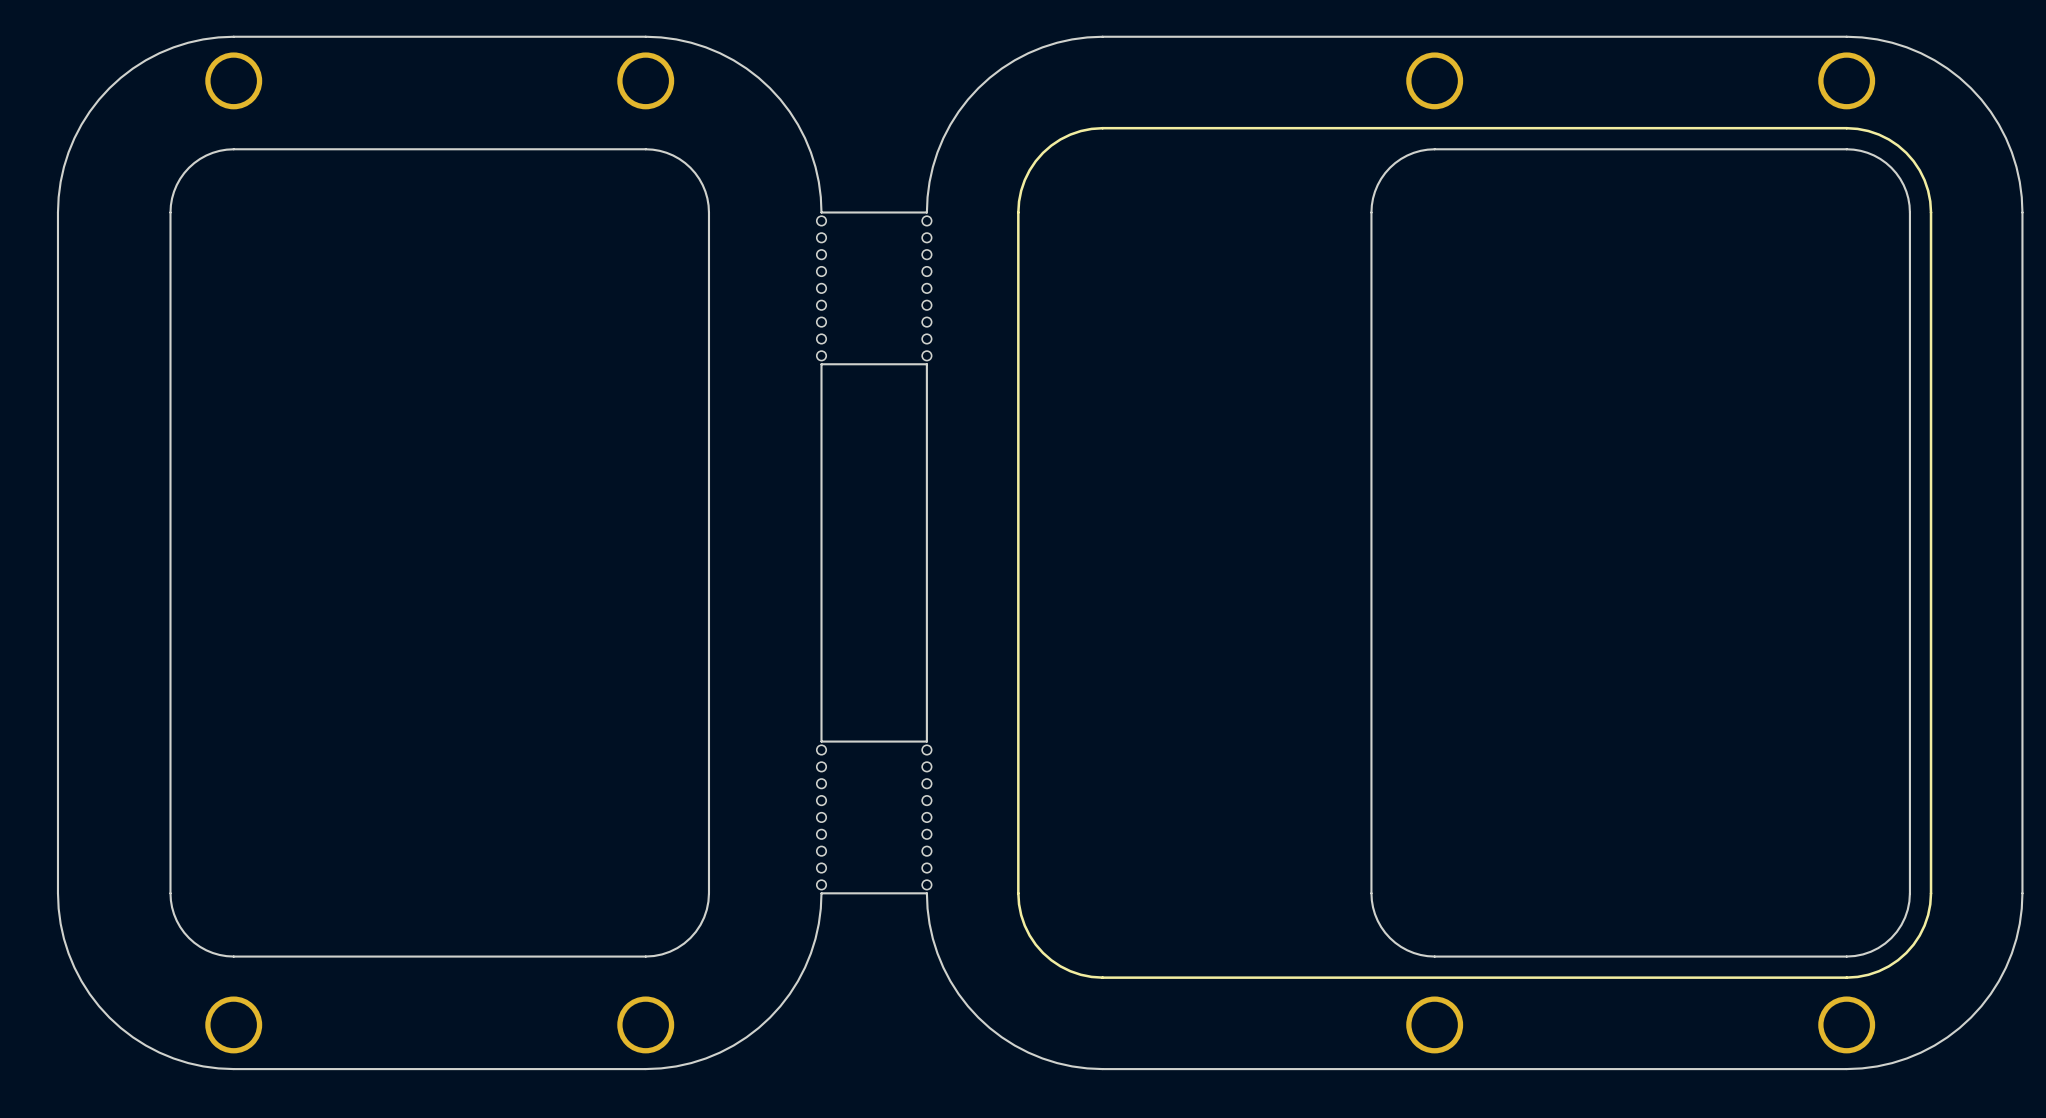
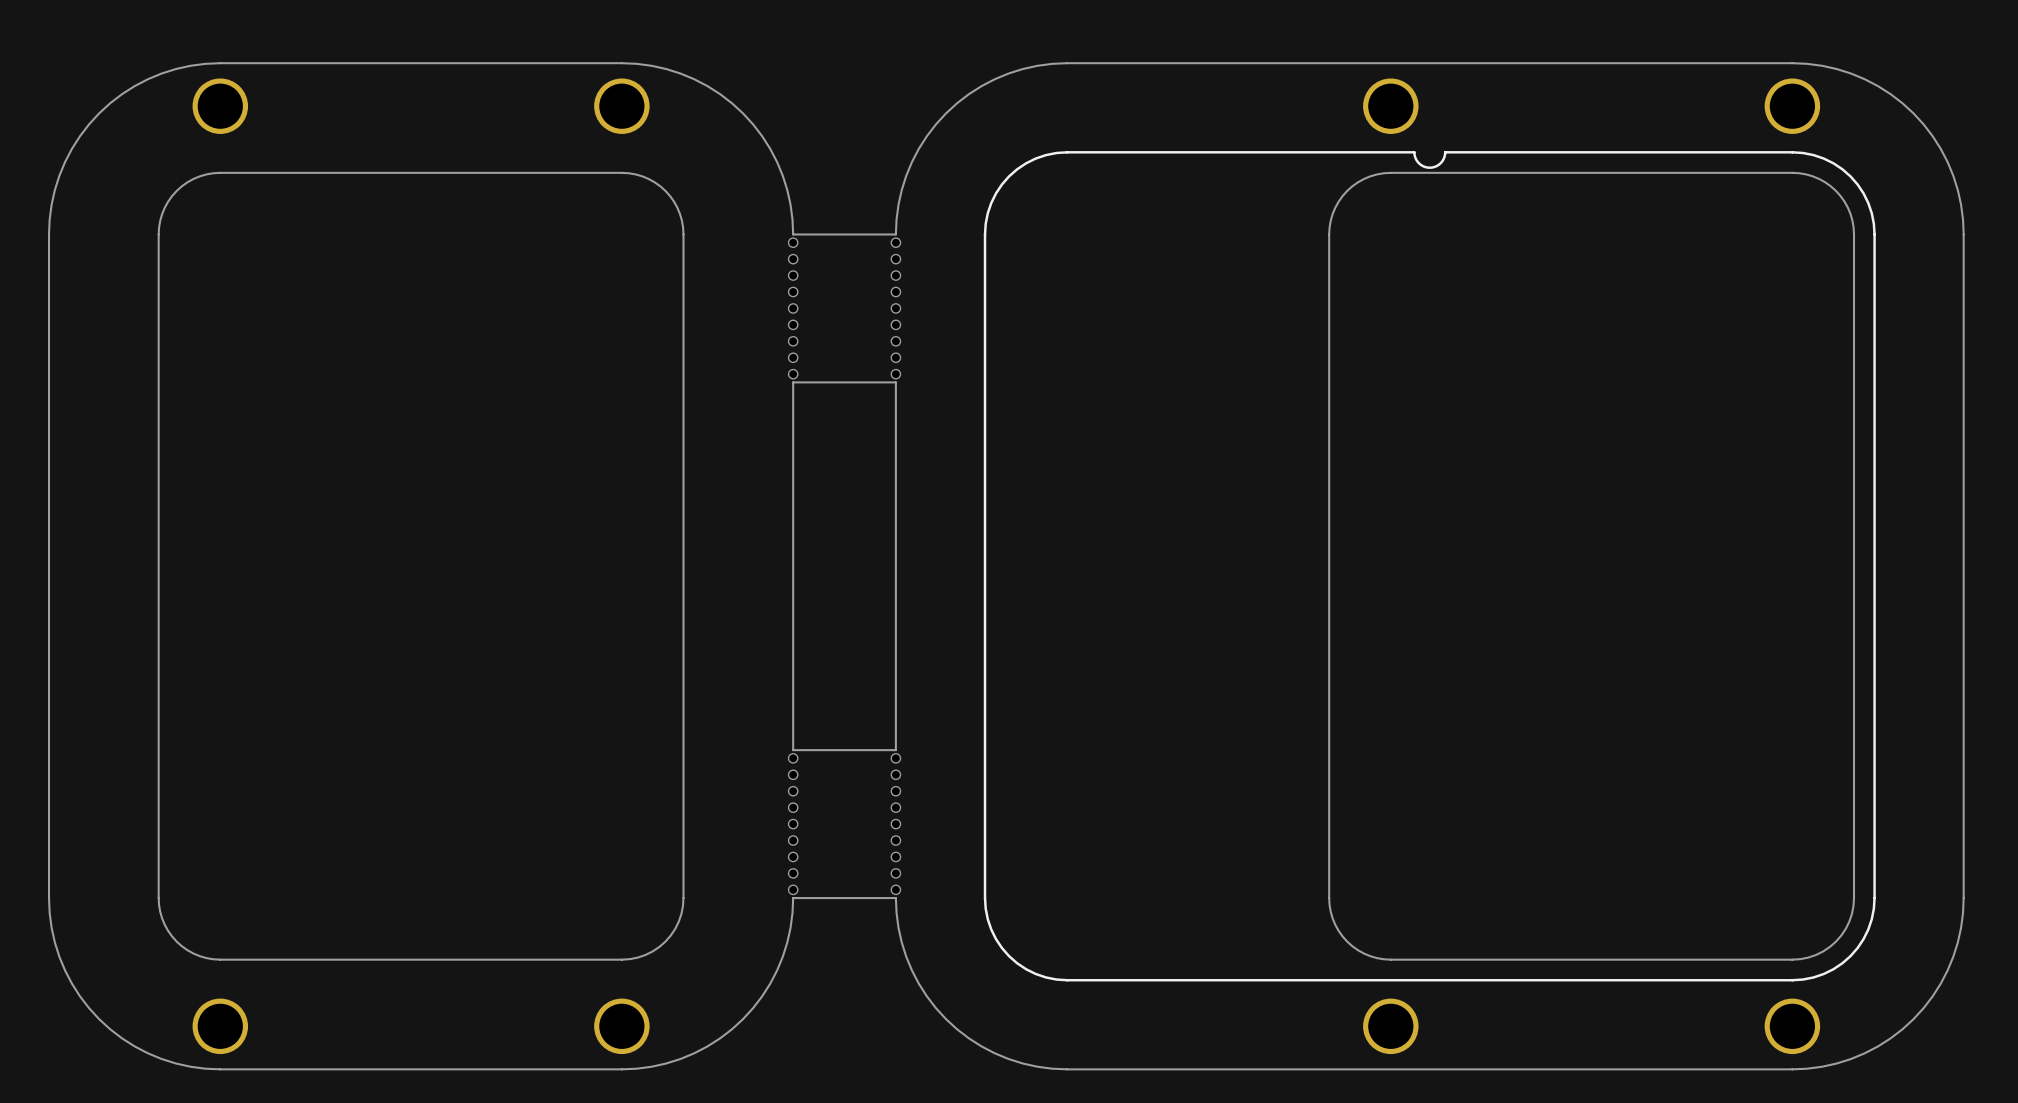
drawing shape: [1017, 126, 1933, 979] -> [983, 151, 1876, 982]

